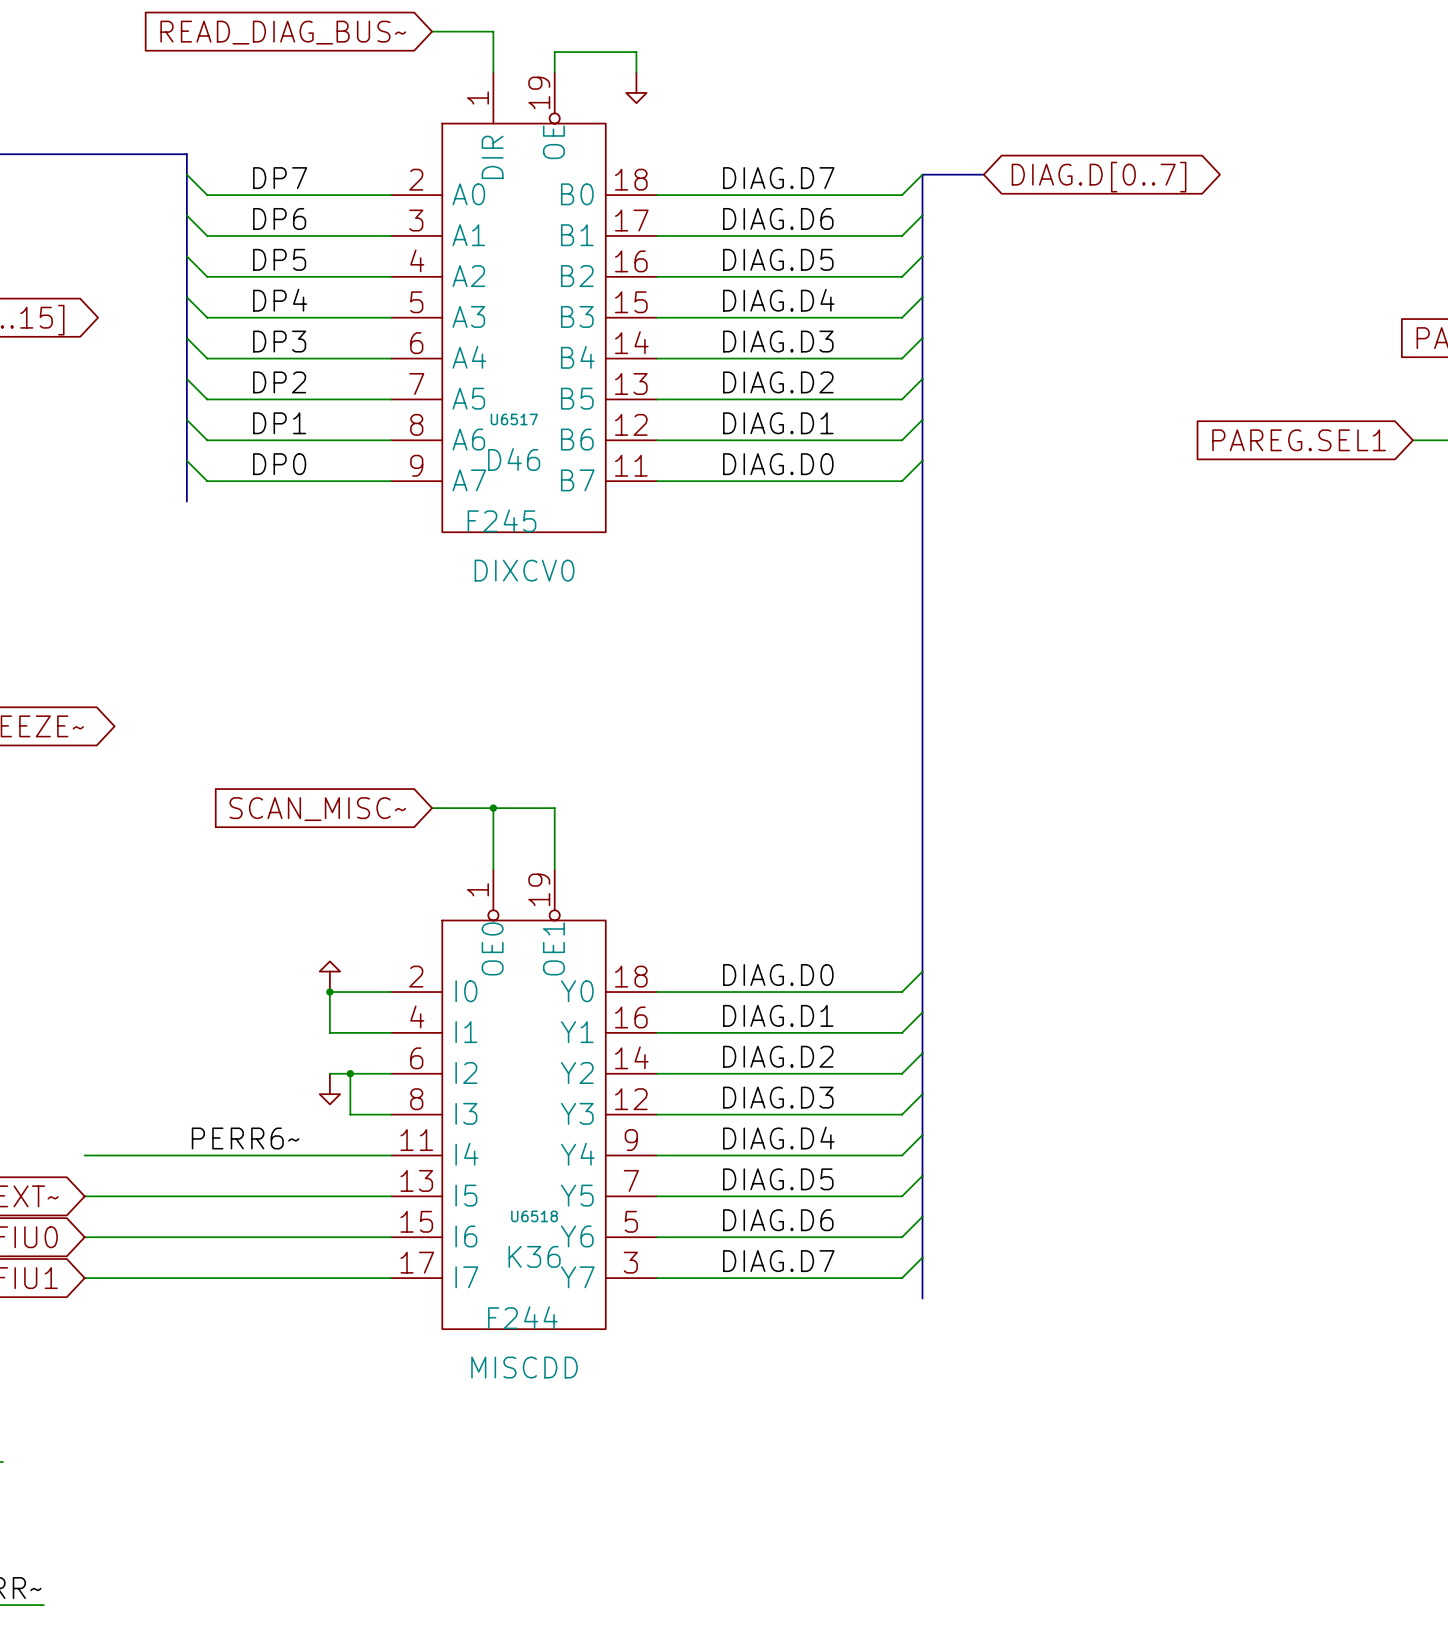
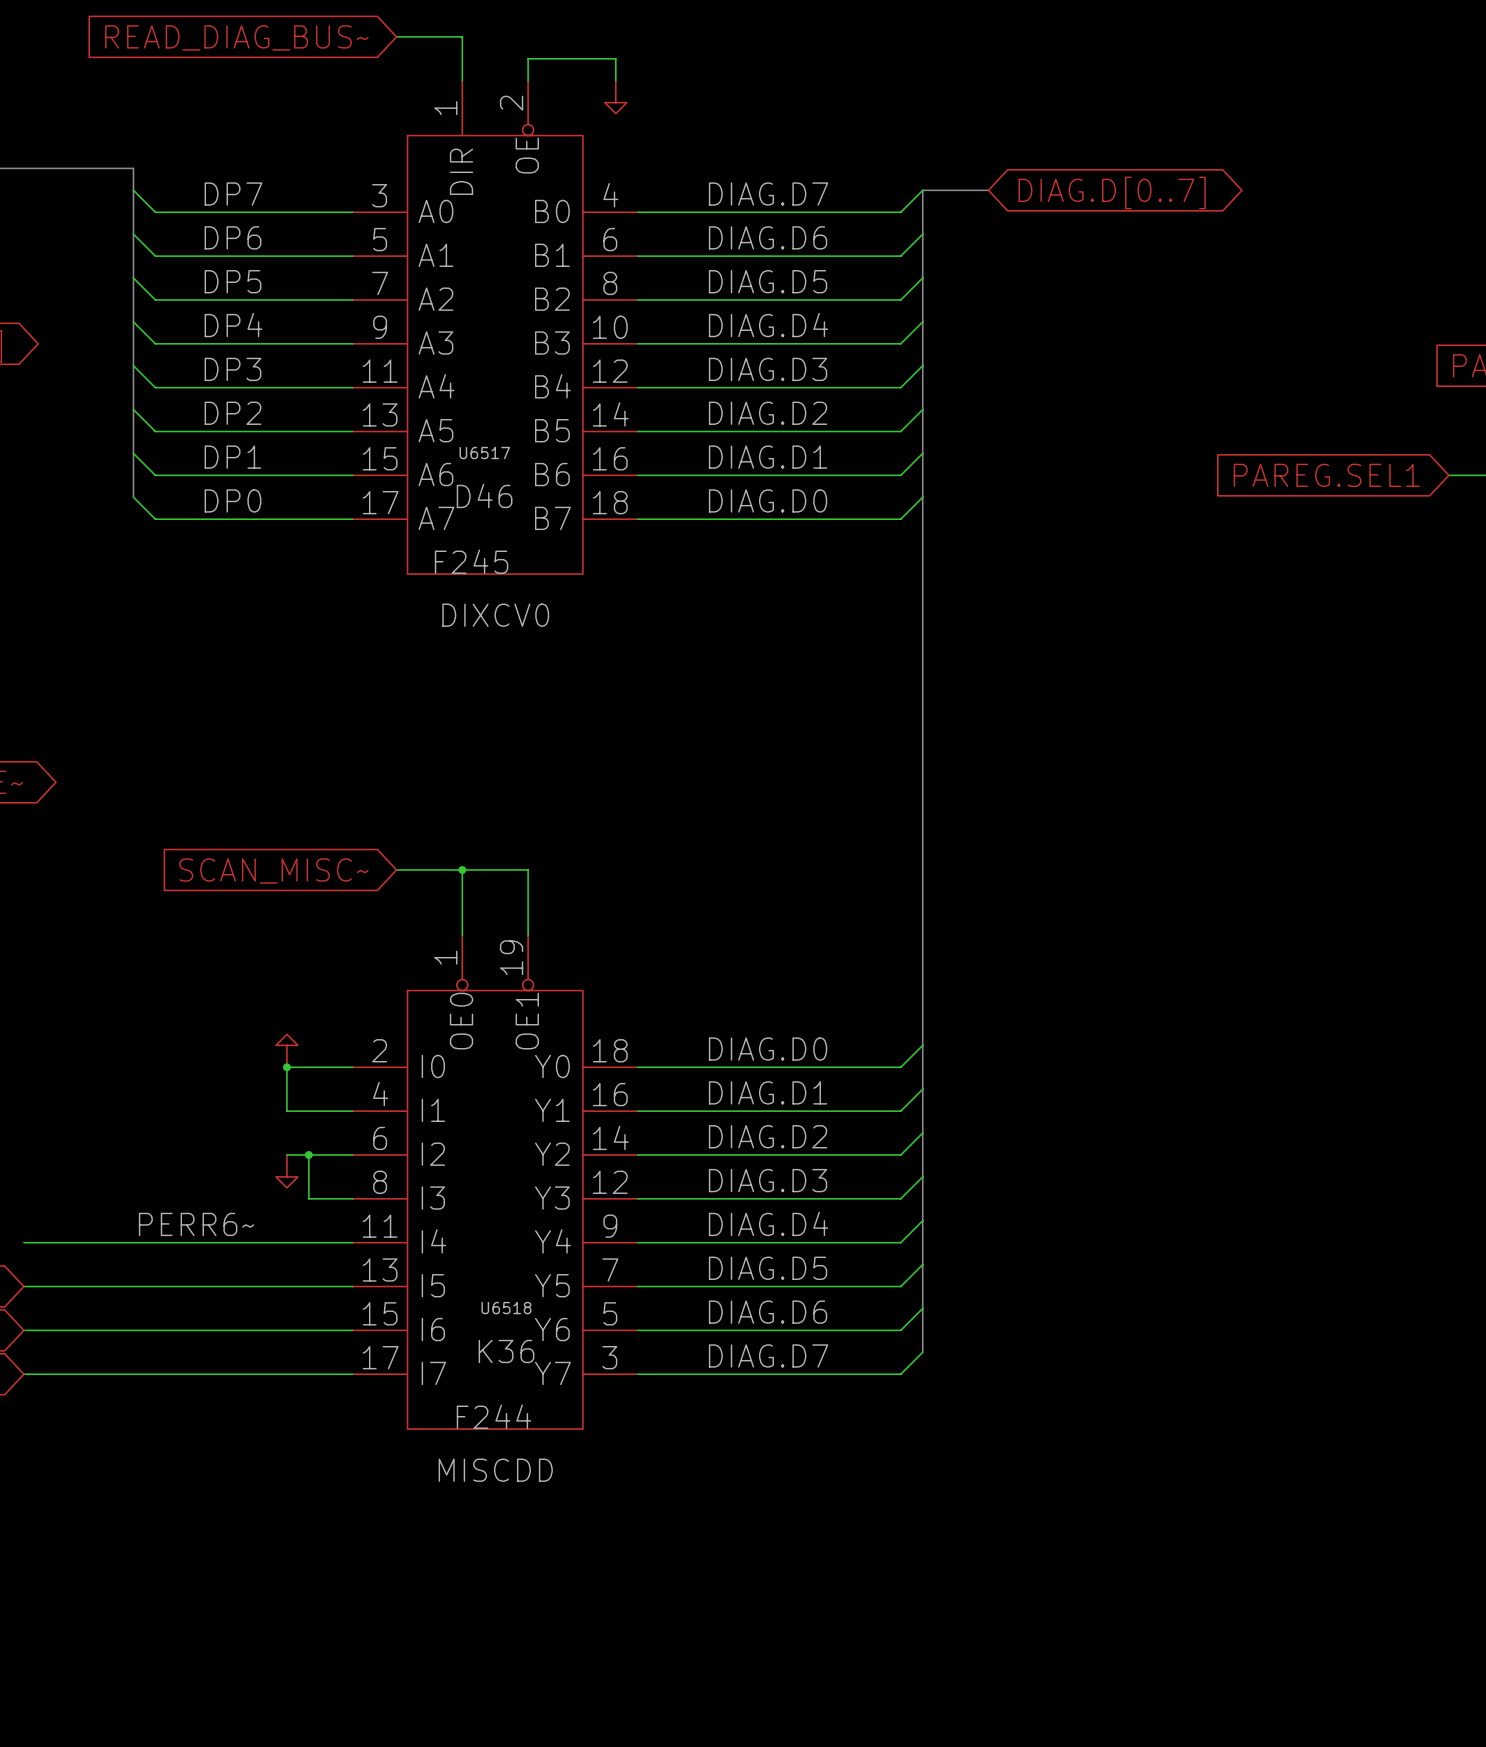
U6517 symbol: [391, 72, 657, 533] -> [352, 80, 638, 575]
bus: (186, 460) (186, 501) -> none
bus: (922, 1257) (922, 1298) -> none

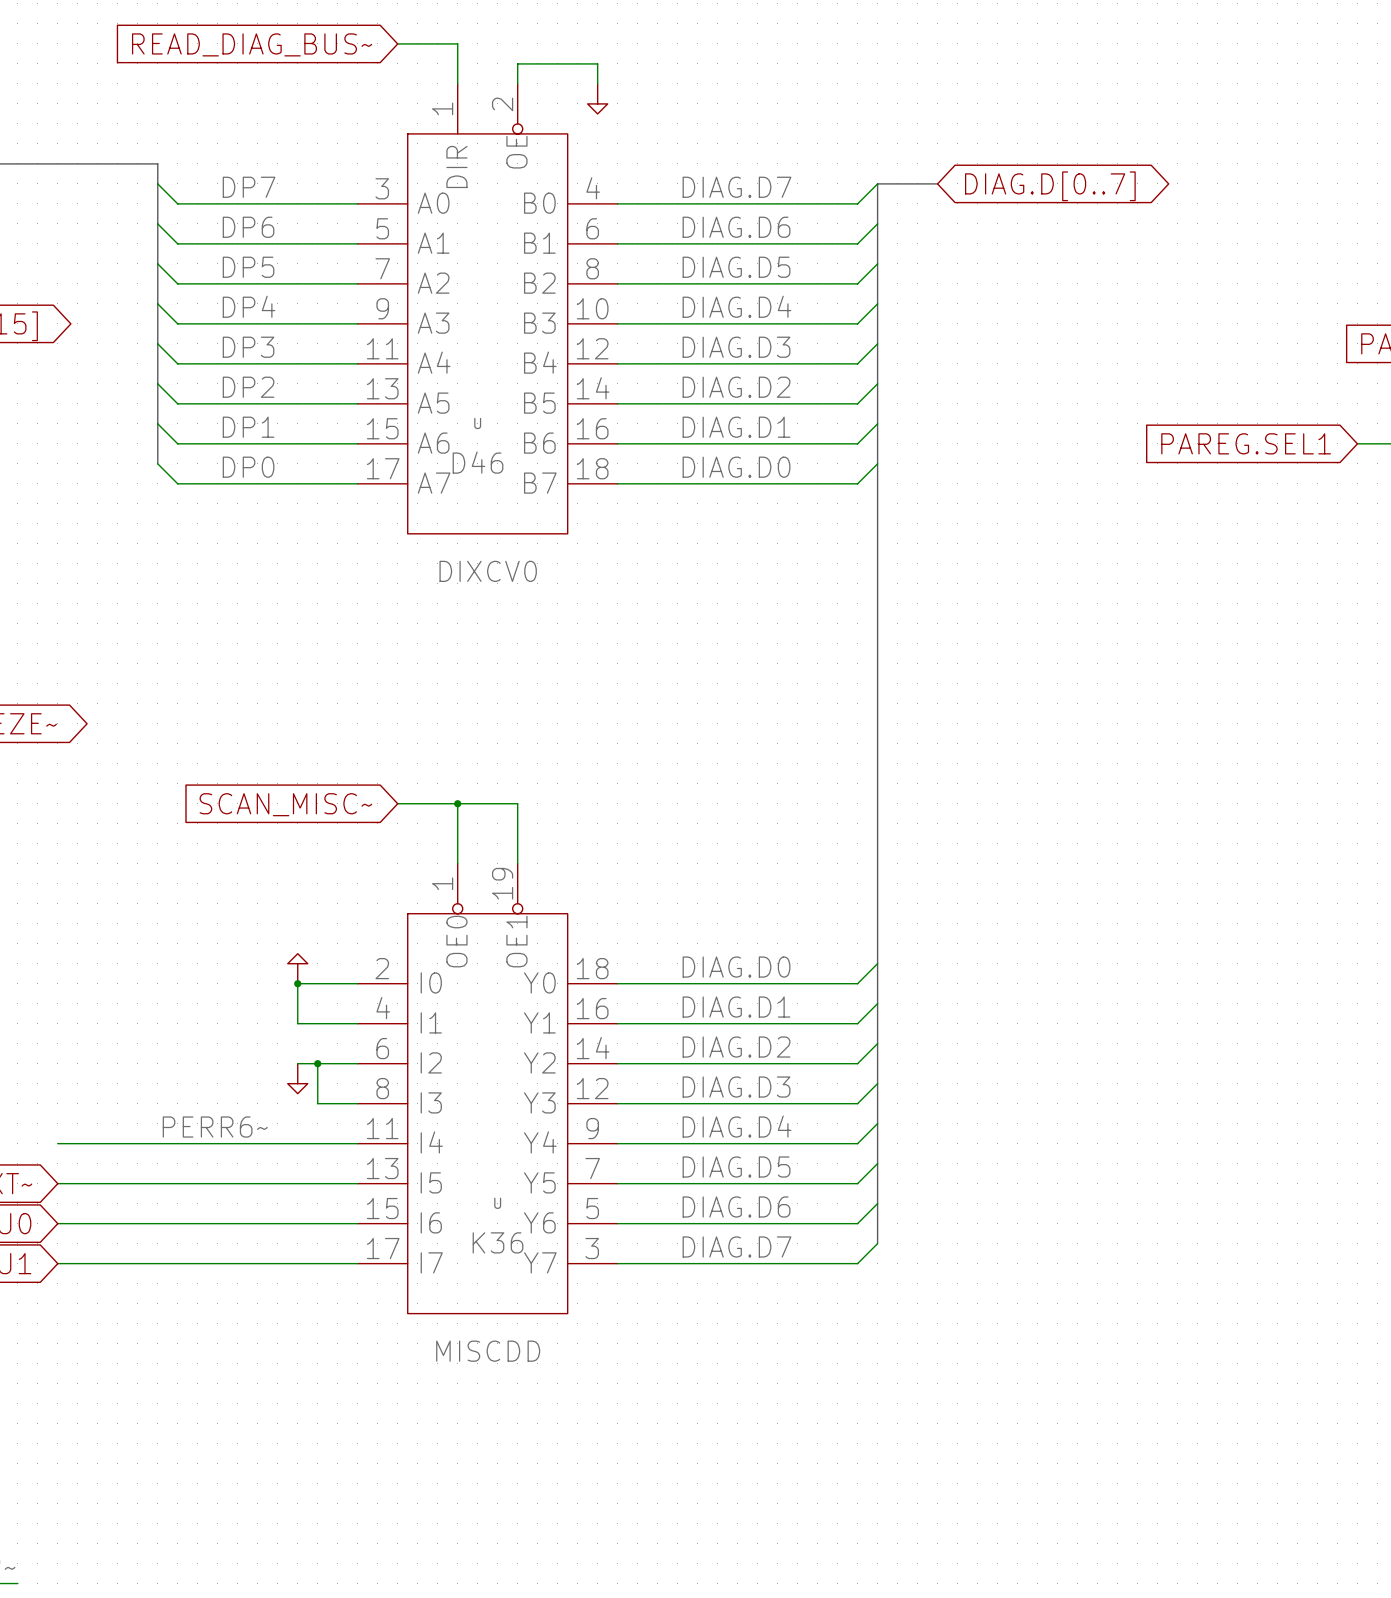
U6517 name: U6517 (484, 453) -> U (477, 423)
U6517 value: F245 (471, 561) -> none
U6518 name: U6518 (506, 1308) -> U (497, 1203)
U6518 value: F244 (493, 1416) -> none

